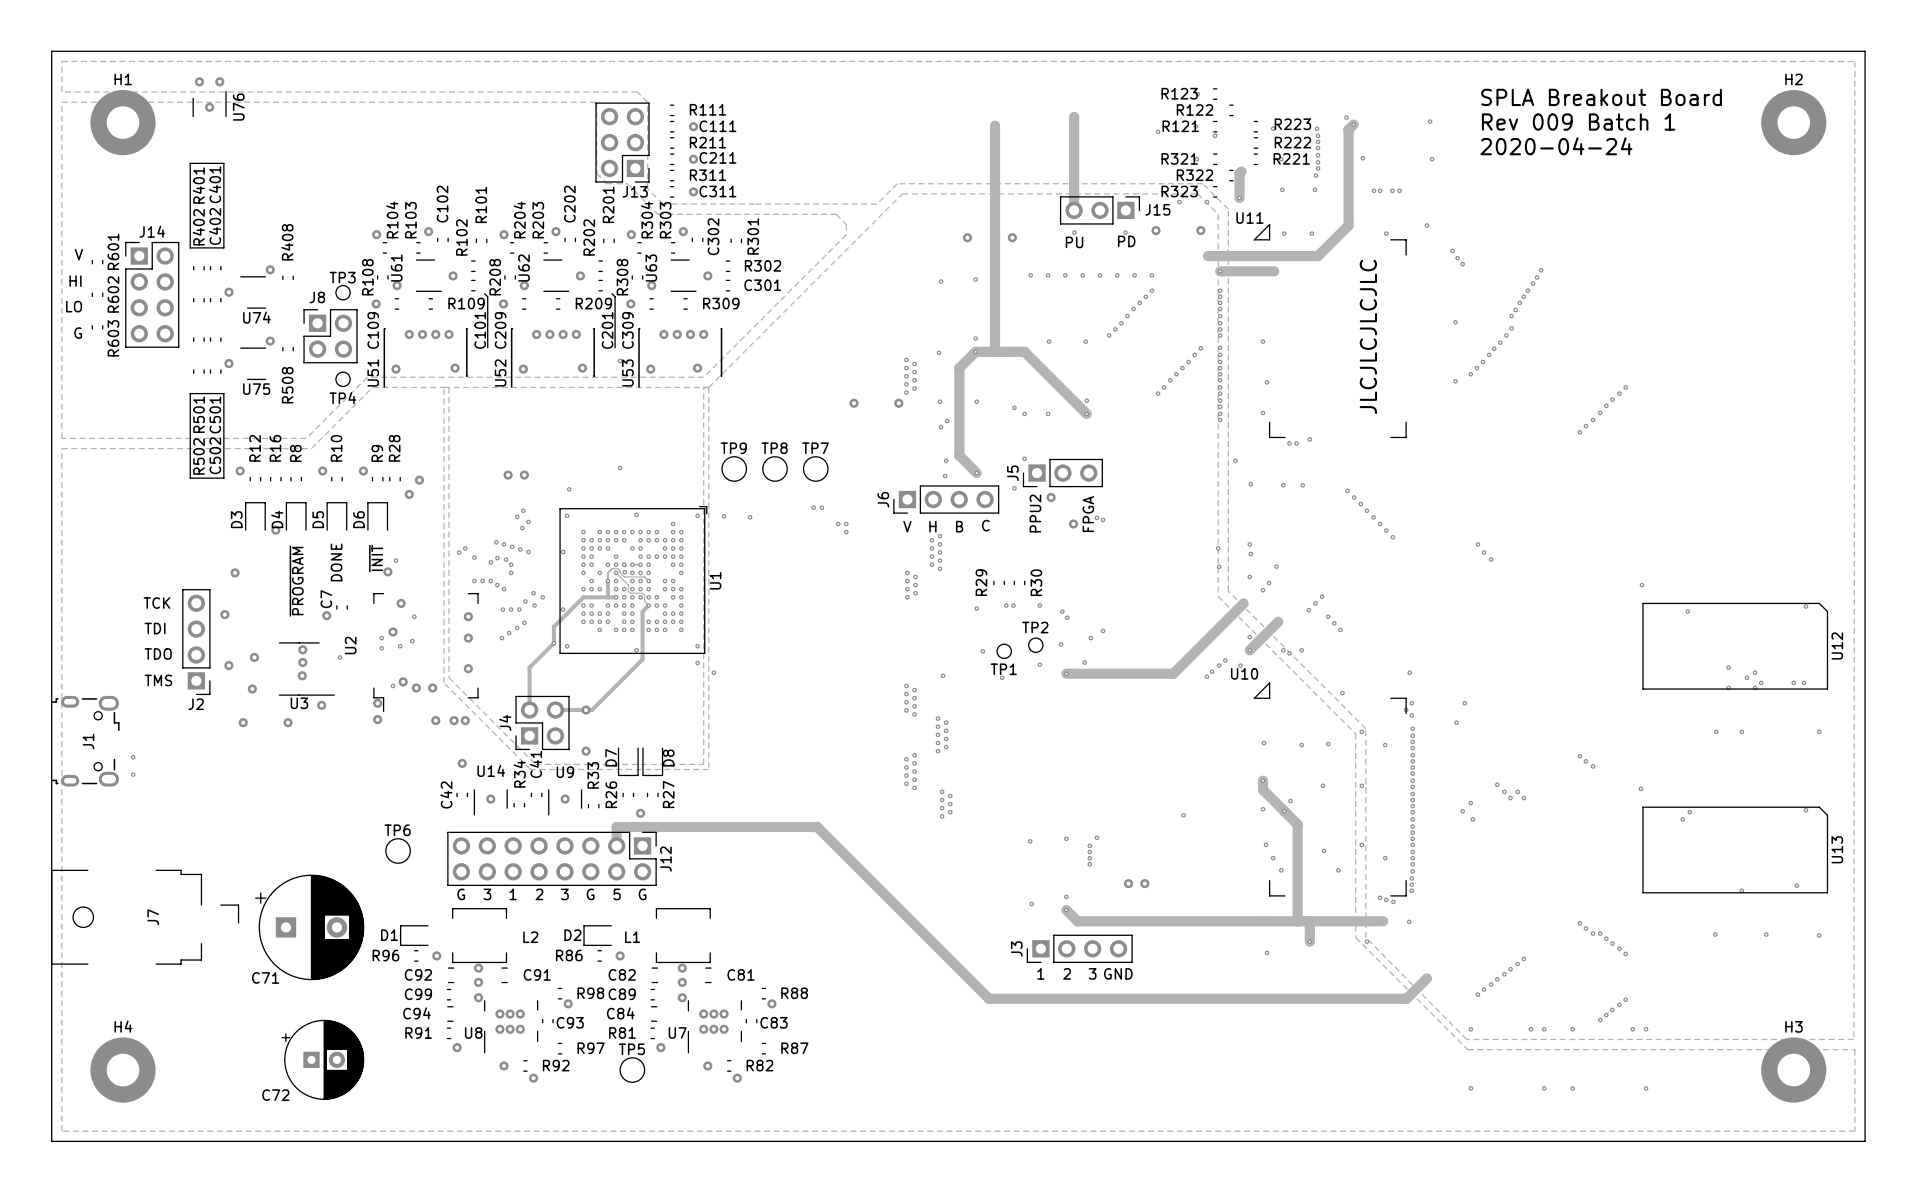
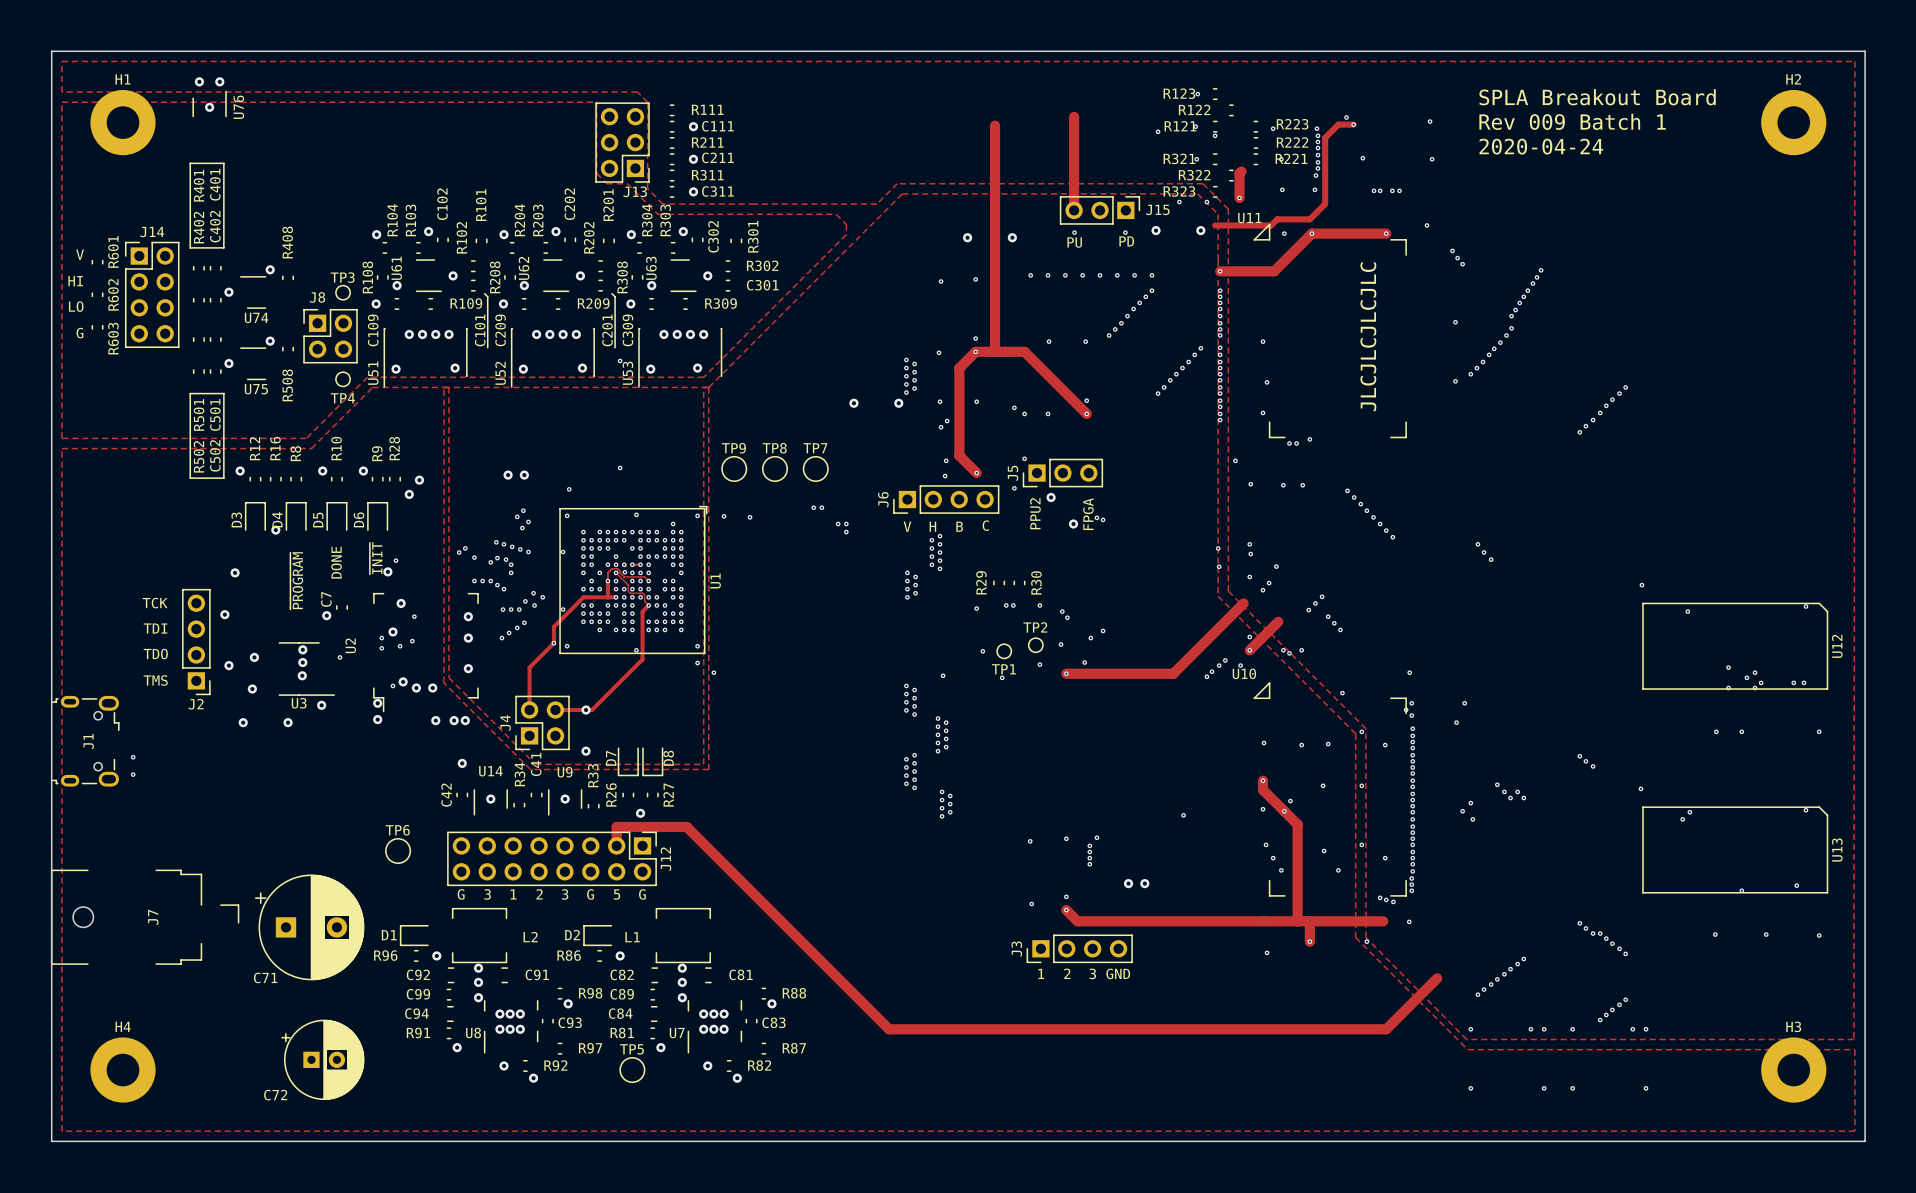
track: (1353, 124) (1348, 129) (1348, 225) (1318, 256) (1207, 256) -> (1353, 124) (1338, 124) (1325, 137) (1325, 204) (1309, 219) (1277, 219) (1271, 225) (1215, 225)
track: none -> (1386, 233) (1311, 233) (1274, 271)
track: (686, 826) (817, 826) (988, 998) (1406, 998) (1427, 978) -> (686, 826) (889, 1029) (1386, 1029) (1437, 978)

